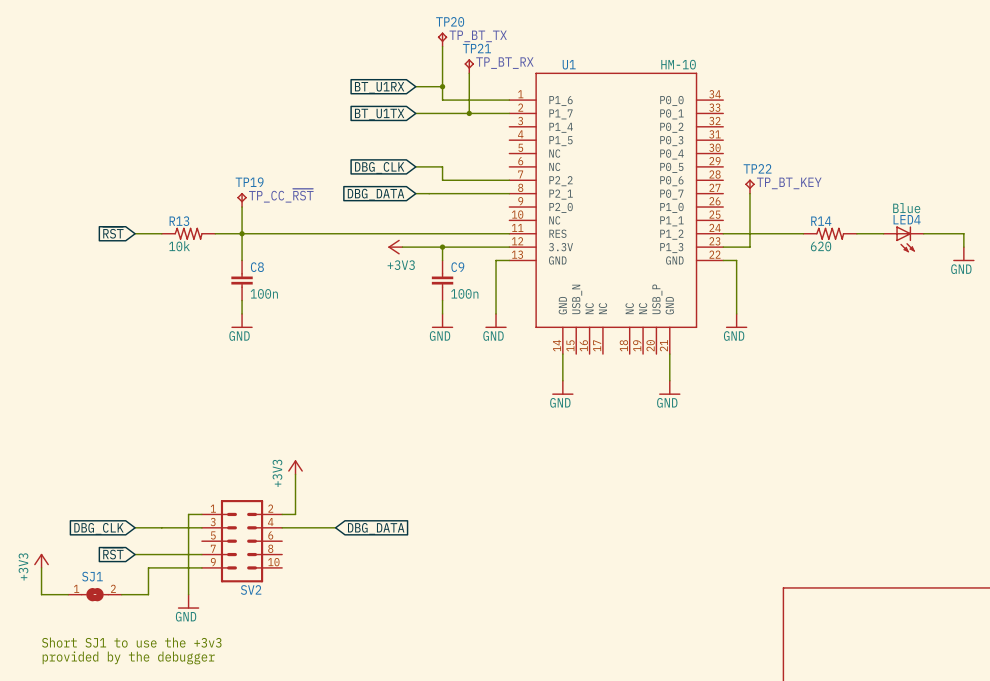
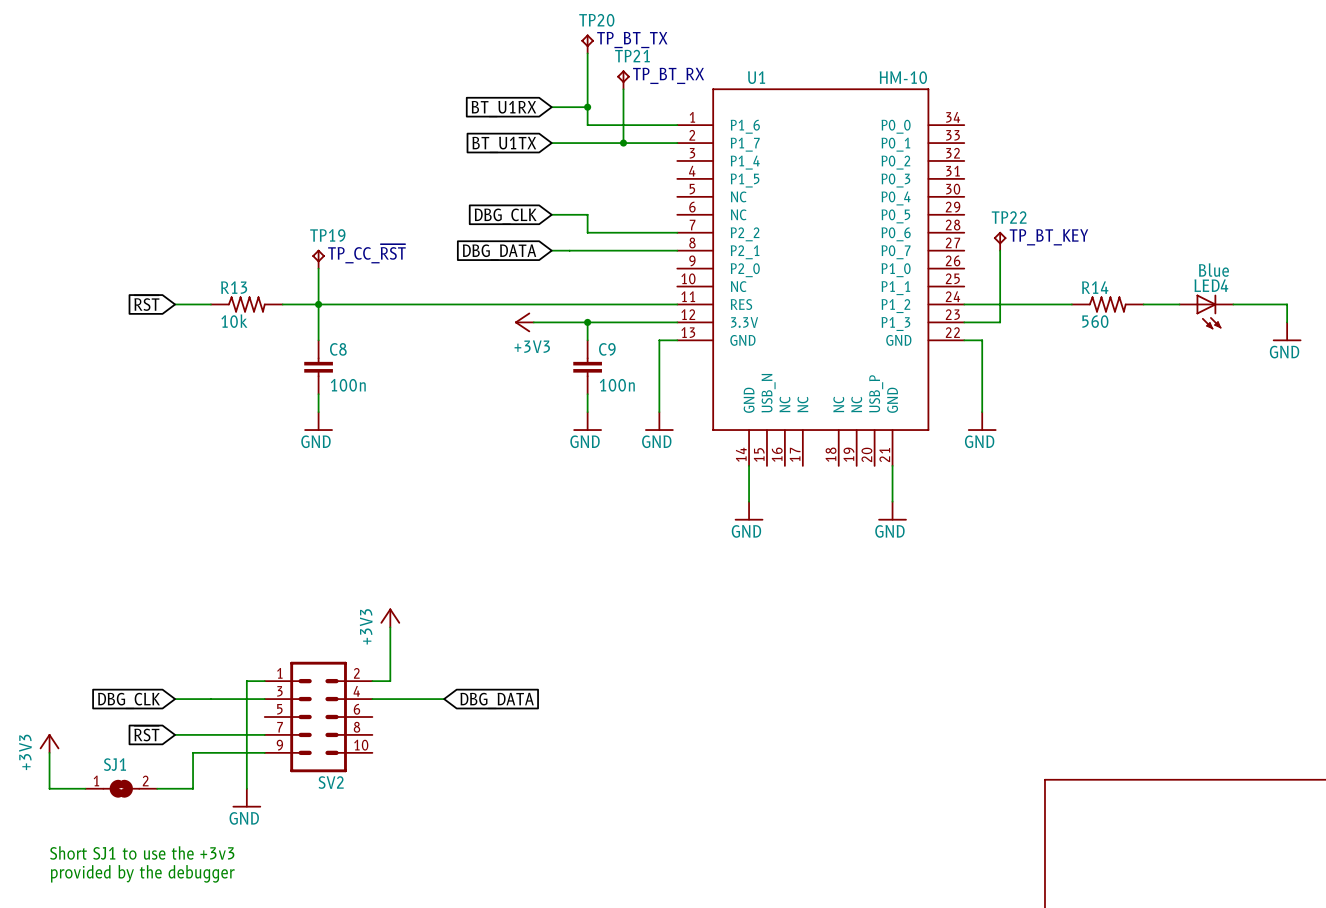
R14 value: 620 (821, 246) -> 560 (1095, 321)

